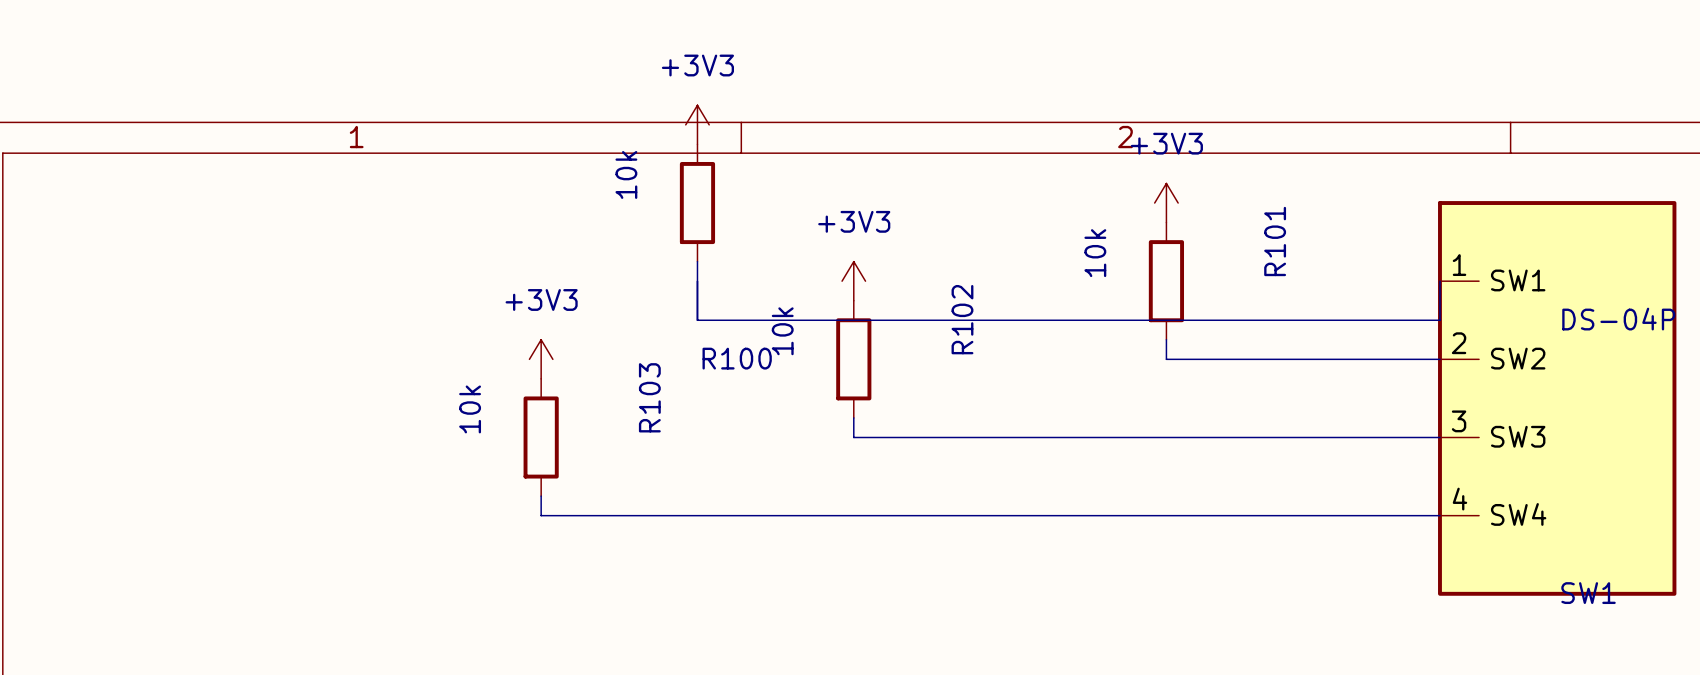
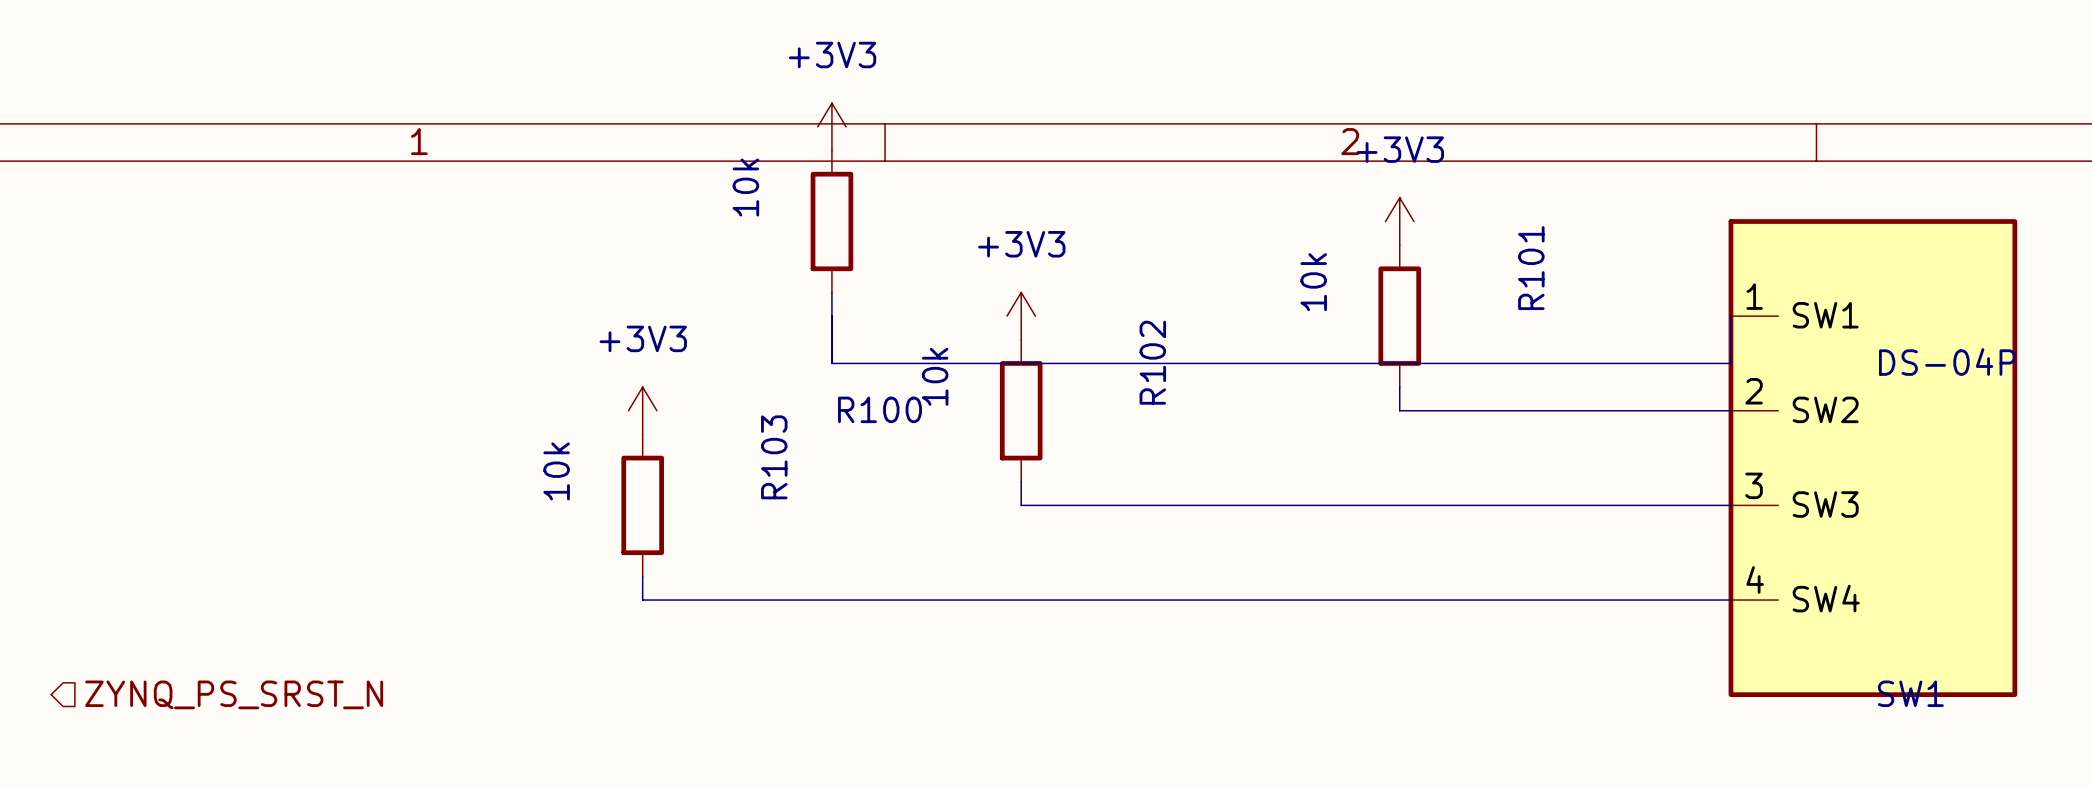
hierarchical label: none -> ZYNQ_PS_SRST_N (234, 694)

